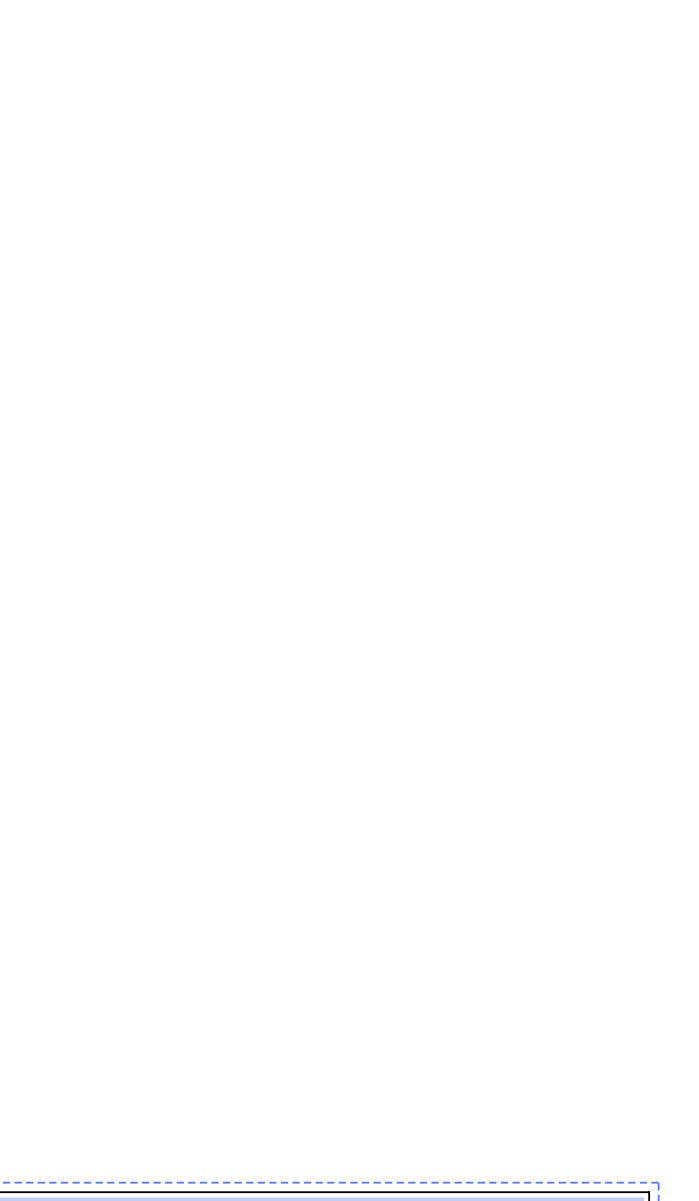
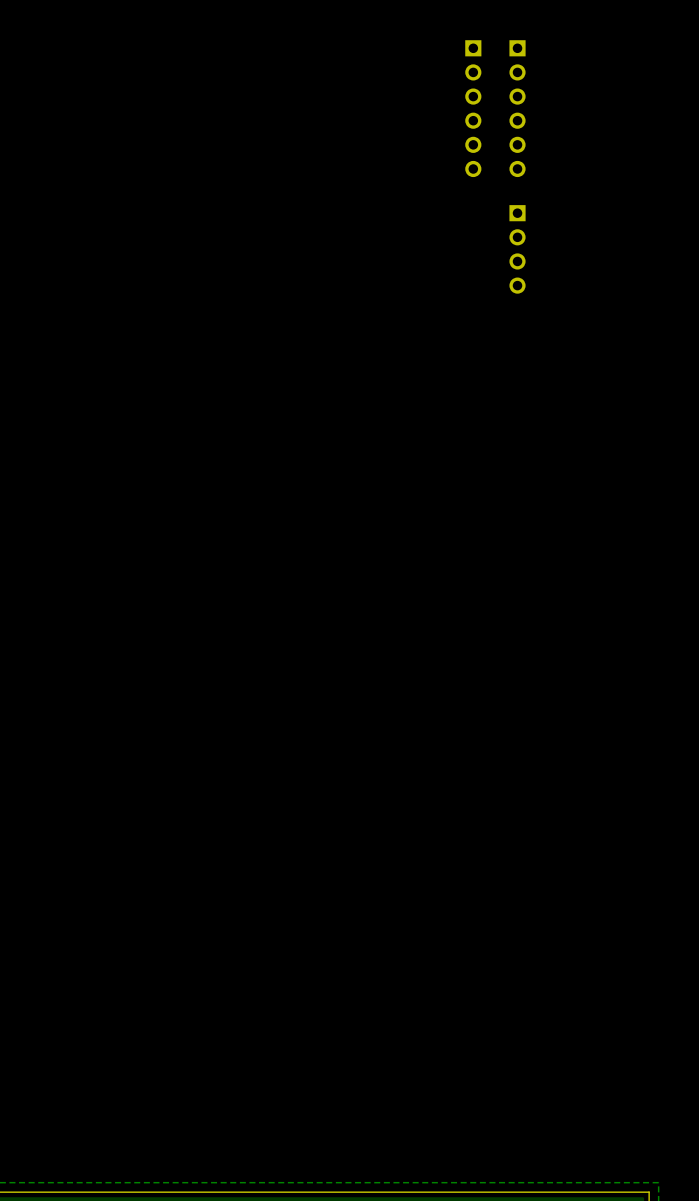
part: none -> (473, 108)
part: none -> (517, 108)
part: none -> (517, 249)

